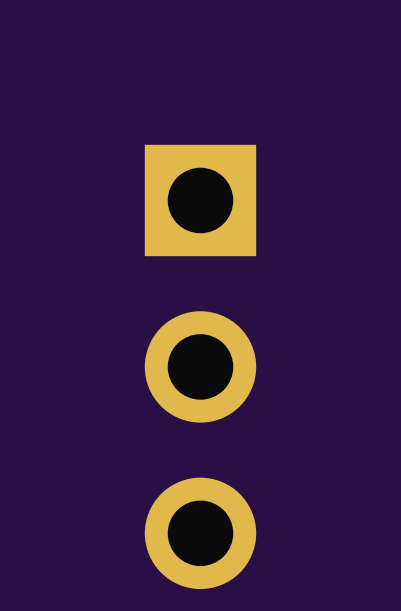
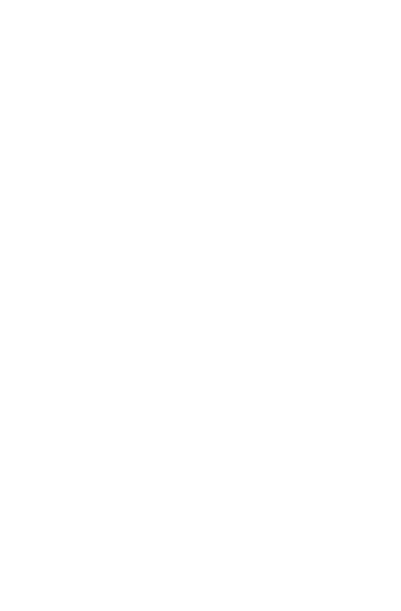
part: (200, 366) -> none

